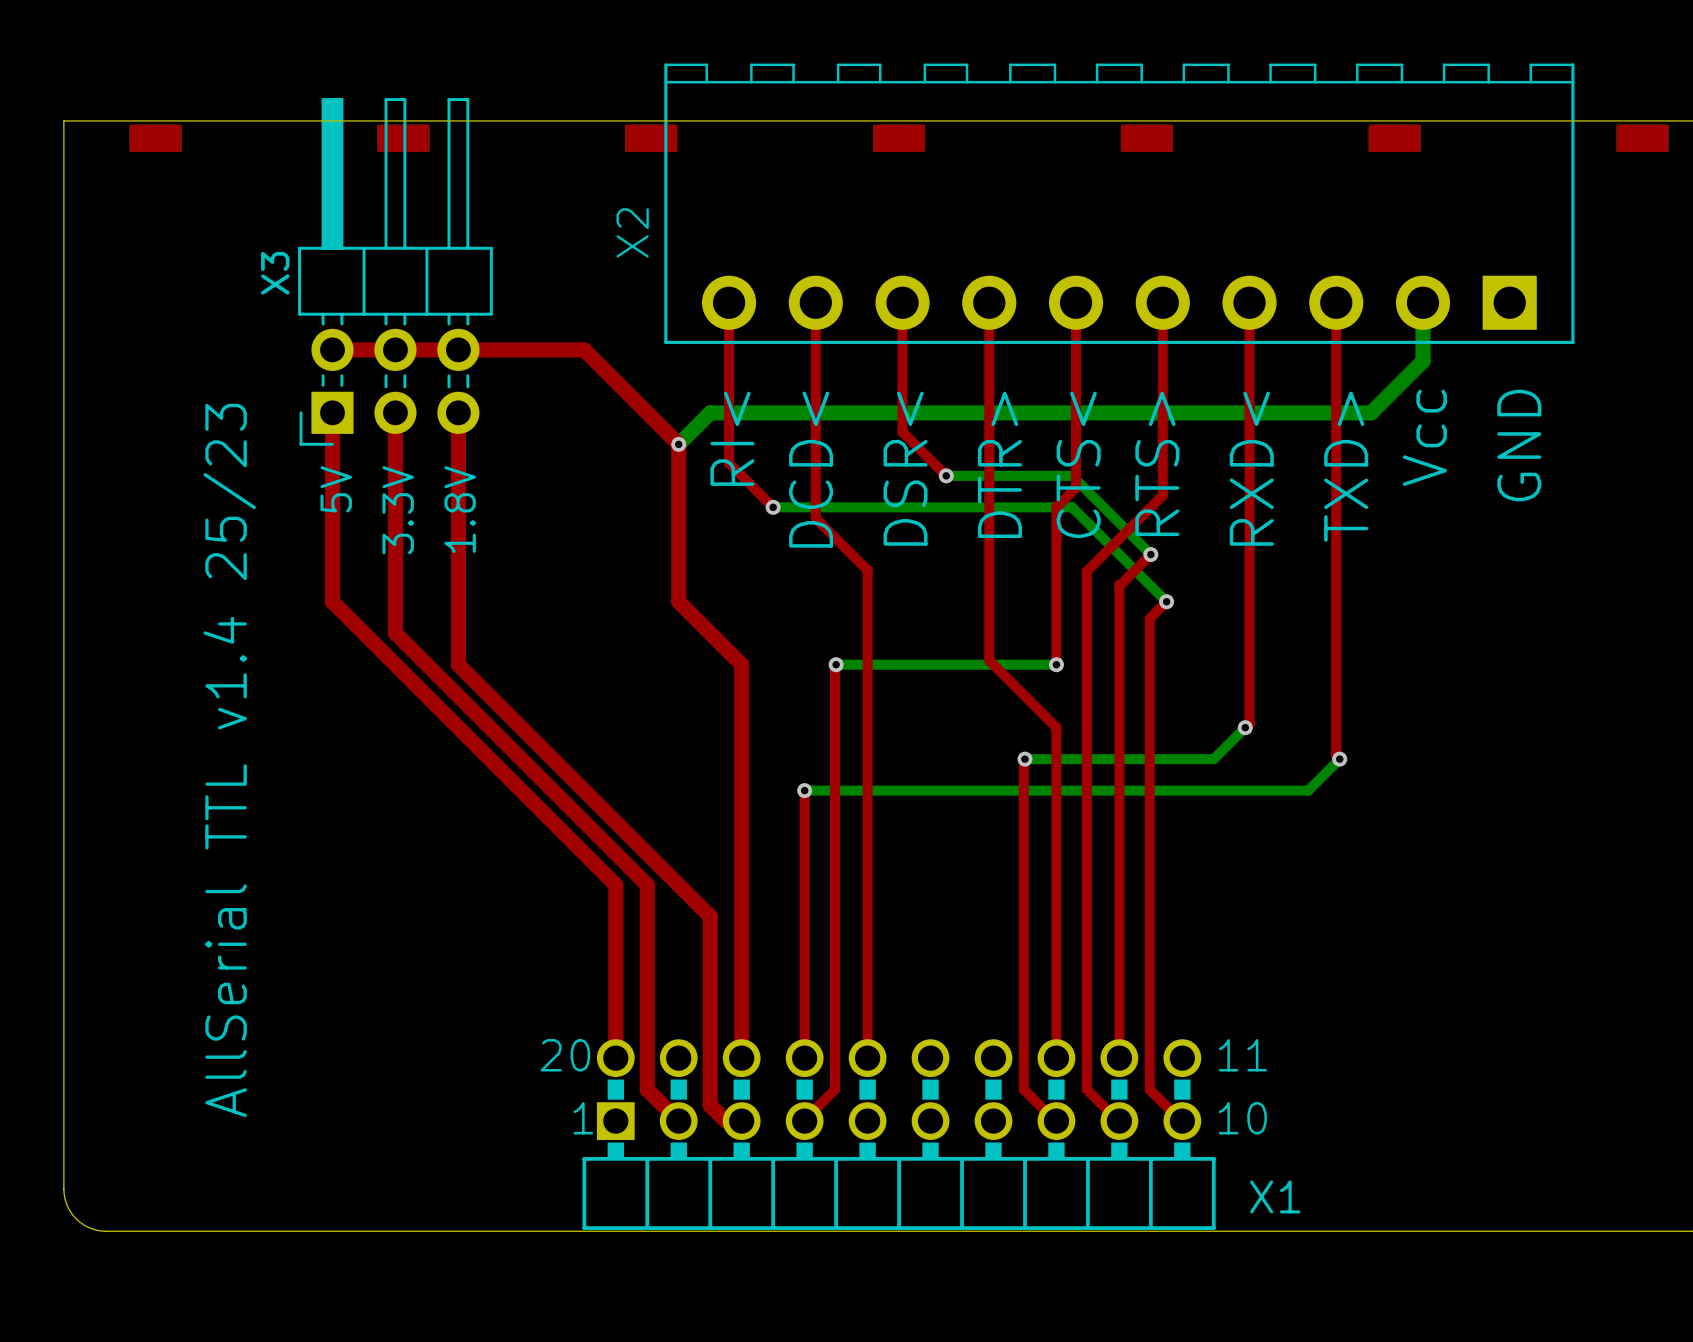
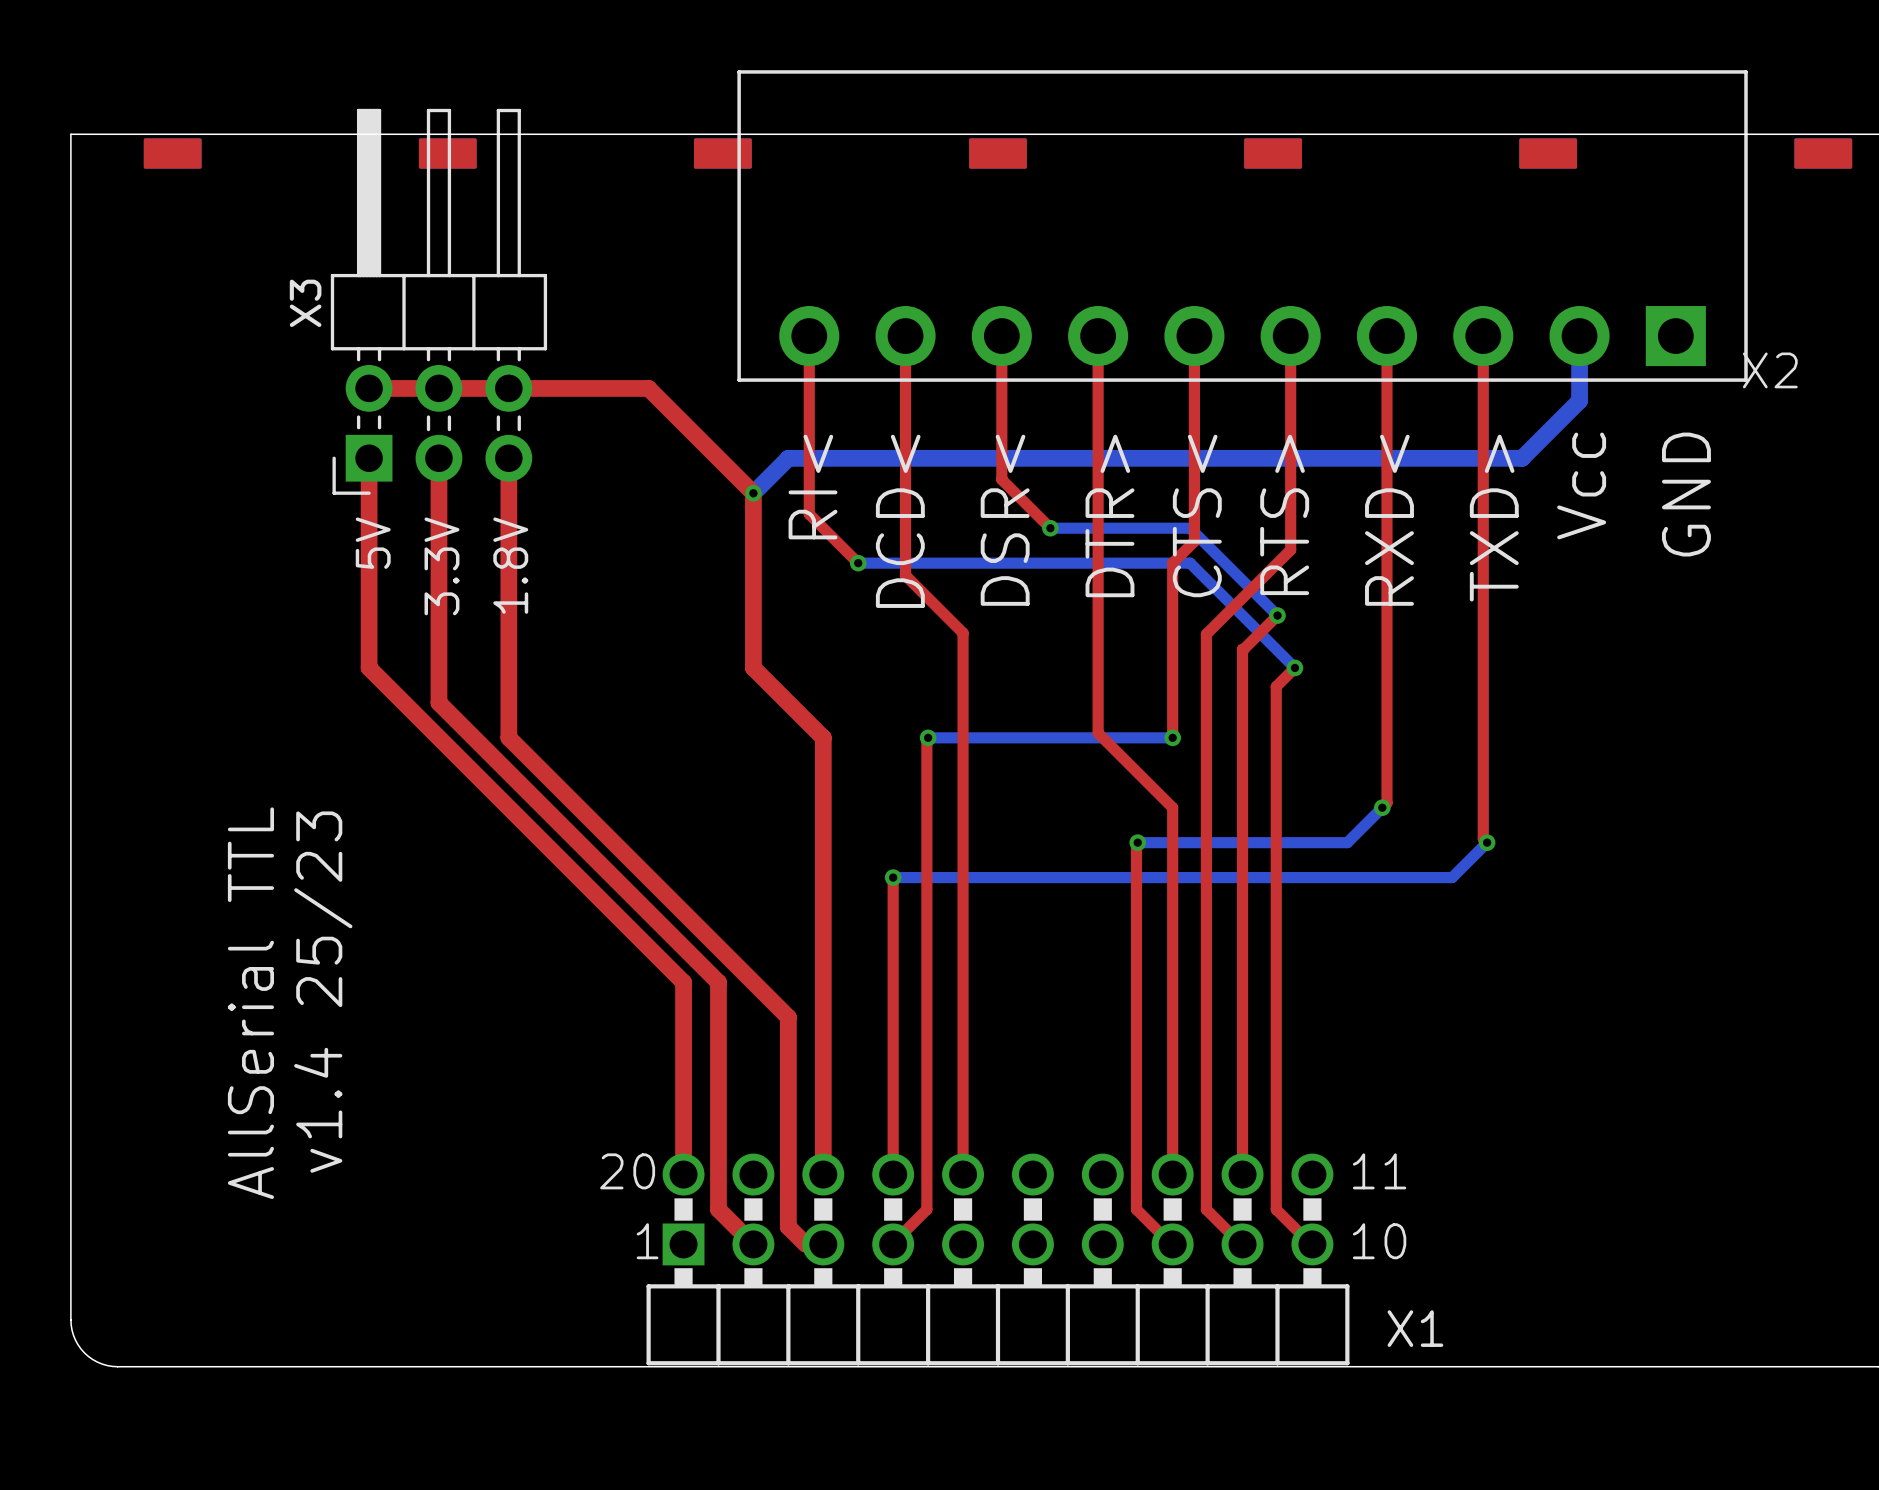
X2 footprint: [664, 63, 1575, 344] -> [737, 70, 1748, 382]
X2 name rotation: 0° (632, 232) -> 90° clockwise (1770, 370)
X2 name position: X2 (632, 232) -> X2 (1770, 370)
text: AllSerial TTL v1.4 25/23 (229, 760) -> AllSerial TTL (250, 1003)
text: none -> v1.4 25/23 (323, 992)

